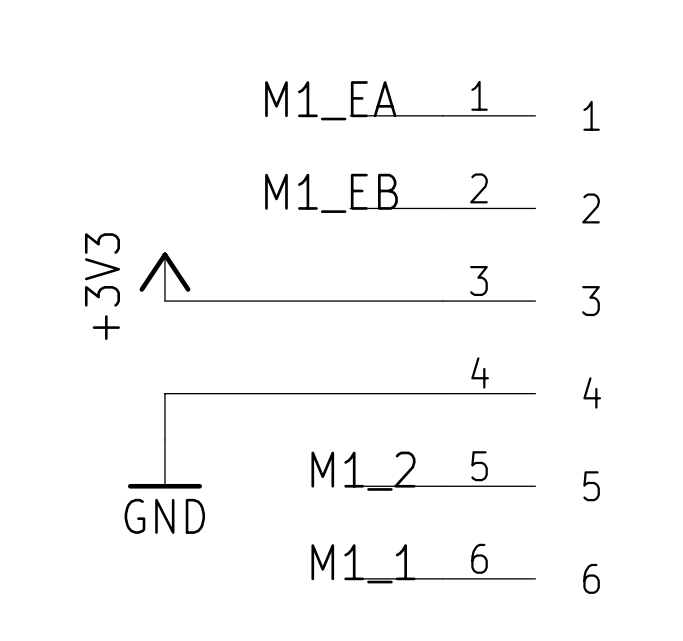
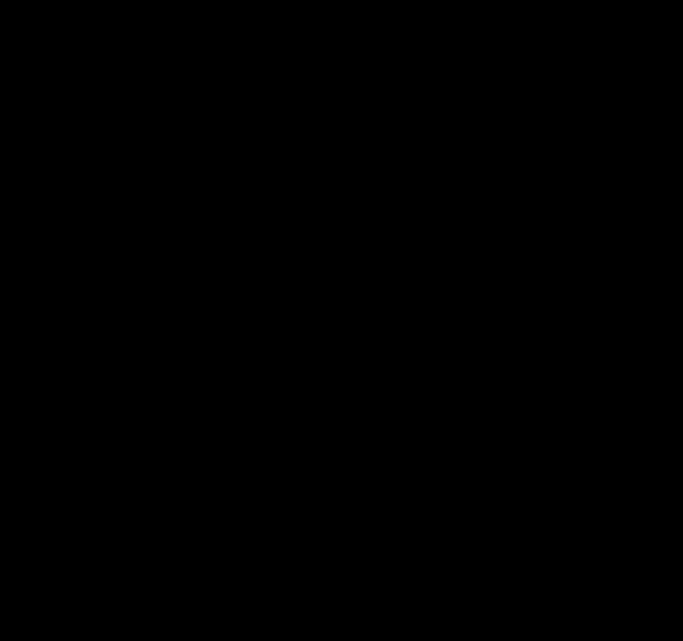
label: M1_EA (330, 100) -> none
wire: (350, 115) (442, 115) -> none
label: M1_EB (331, 193) -> none
wire: (350, 208) (442, 208) -> none
power symbol: +3V3 (164, 276) -> none
wire: (164, 301) (442, 301) -> none
part: (489, 347) -> none
wire: (442, 393) (164, 393) (164, 439) -> none
power symbol: GND (164, 464) -> none
label: M1_2 (363, 471) -> none
wire: (350, 486) (442, 486) -> none
label: M1_1 (363, 563) -> none
wire: (350, 578) (442, 578) -> none

